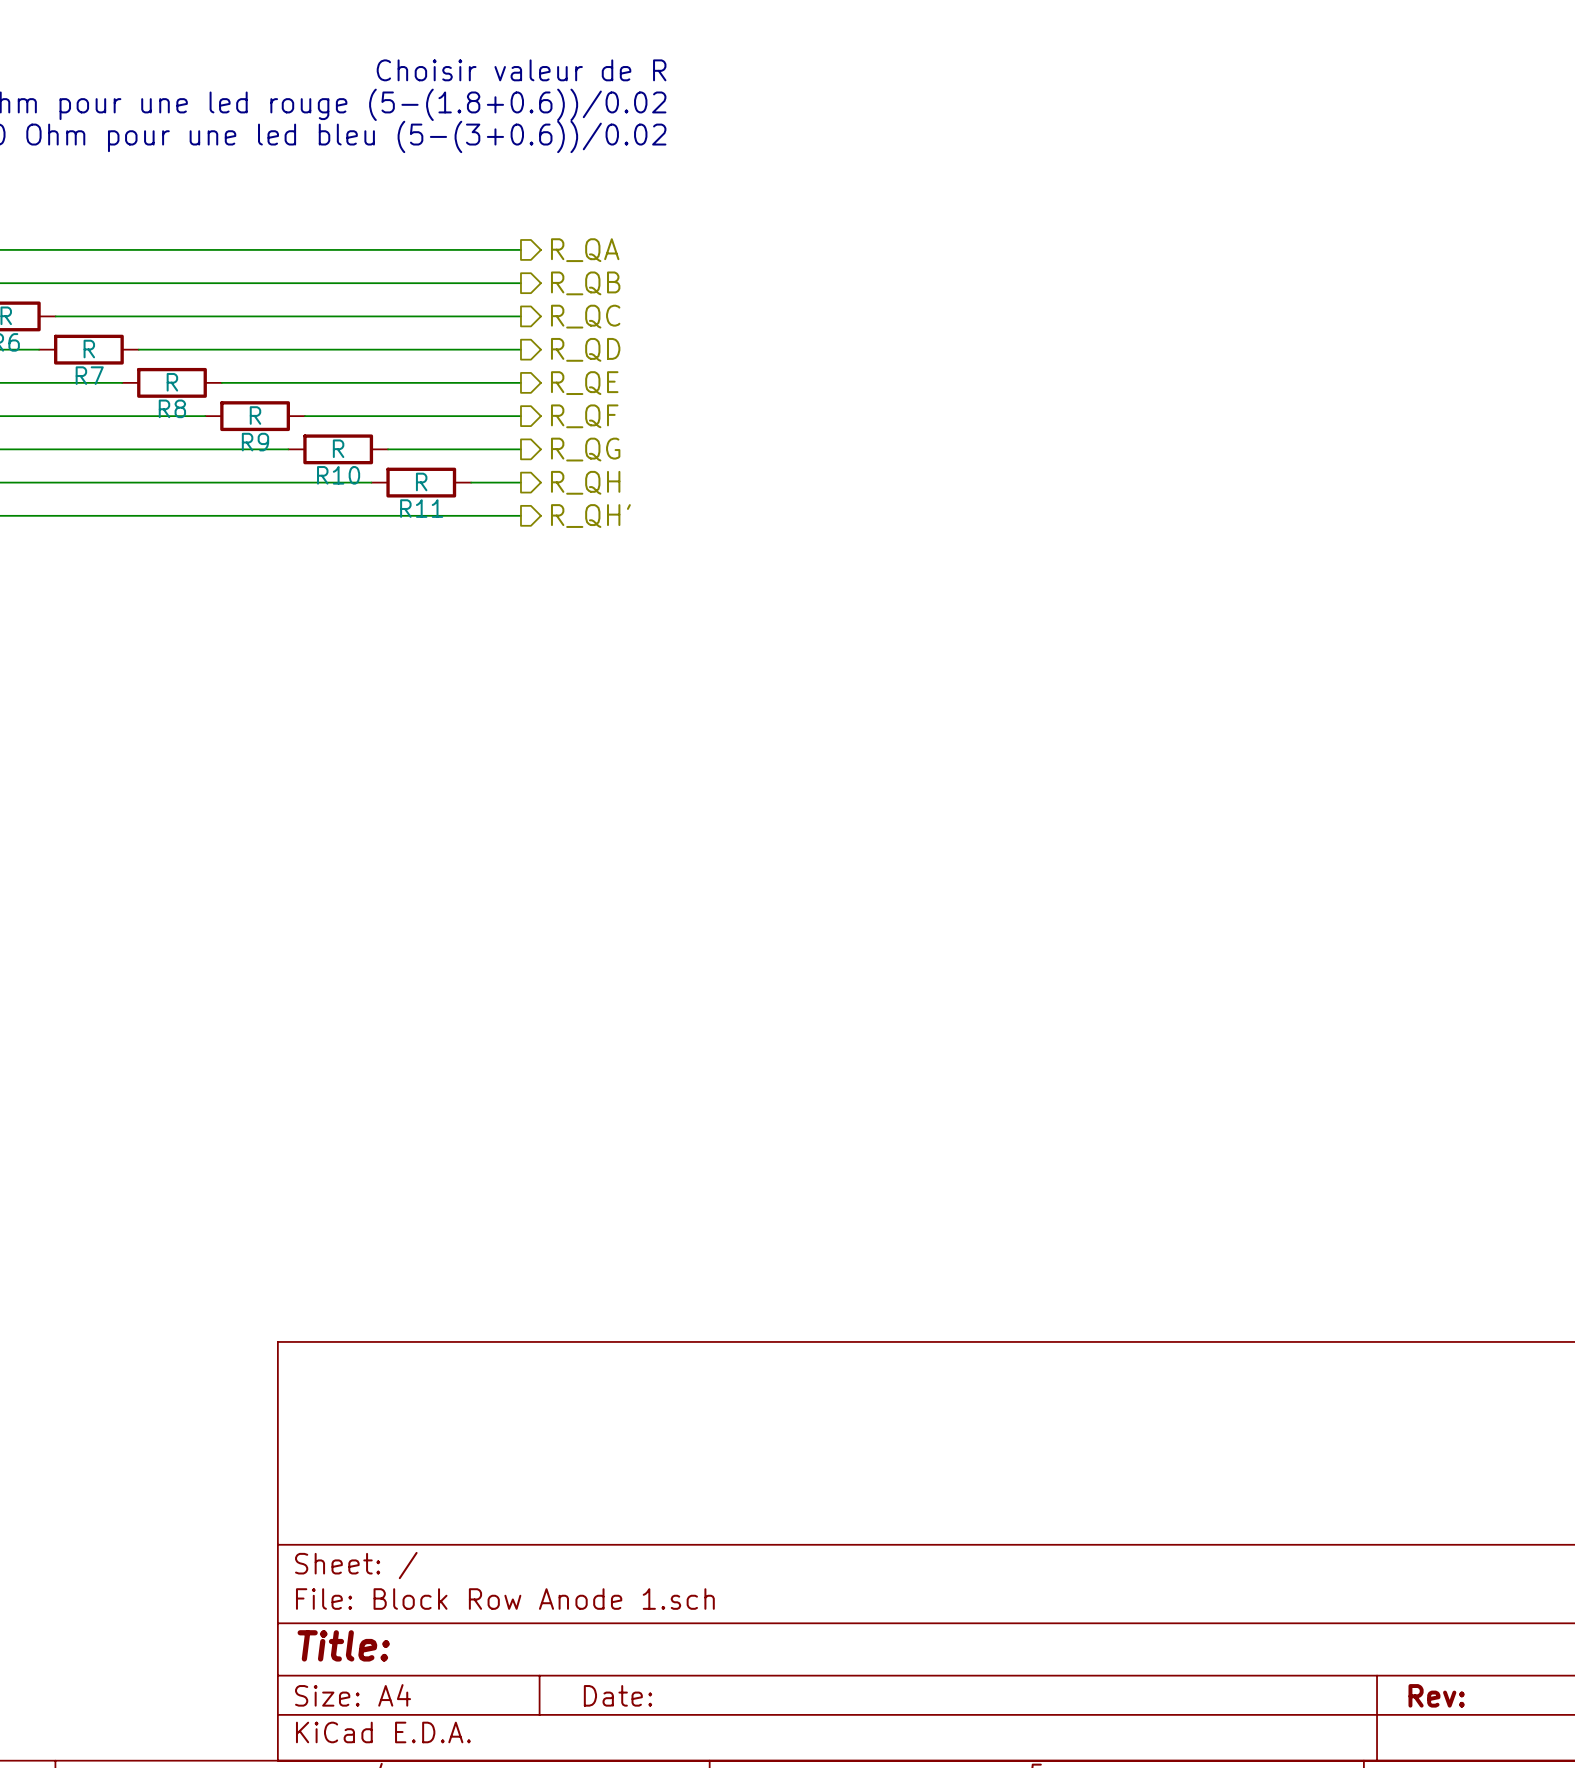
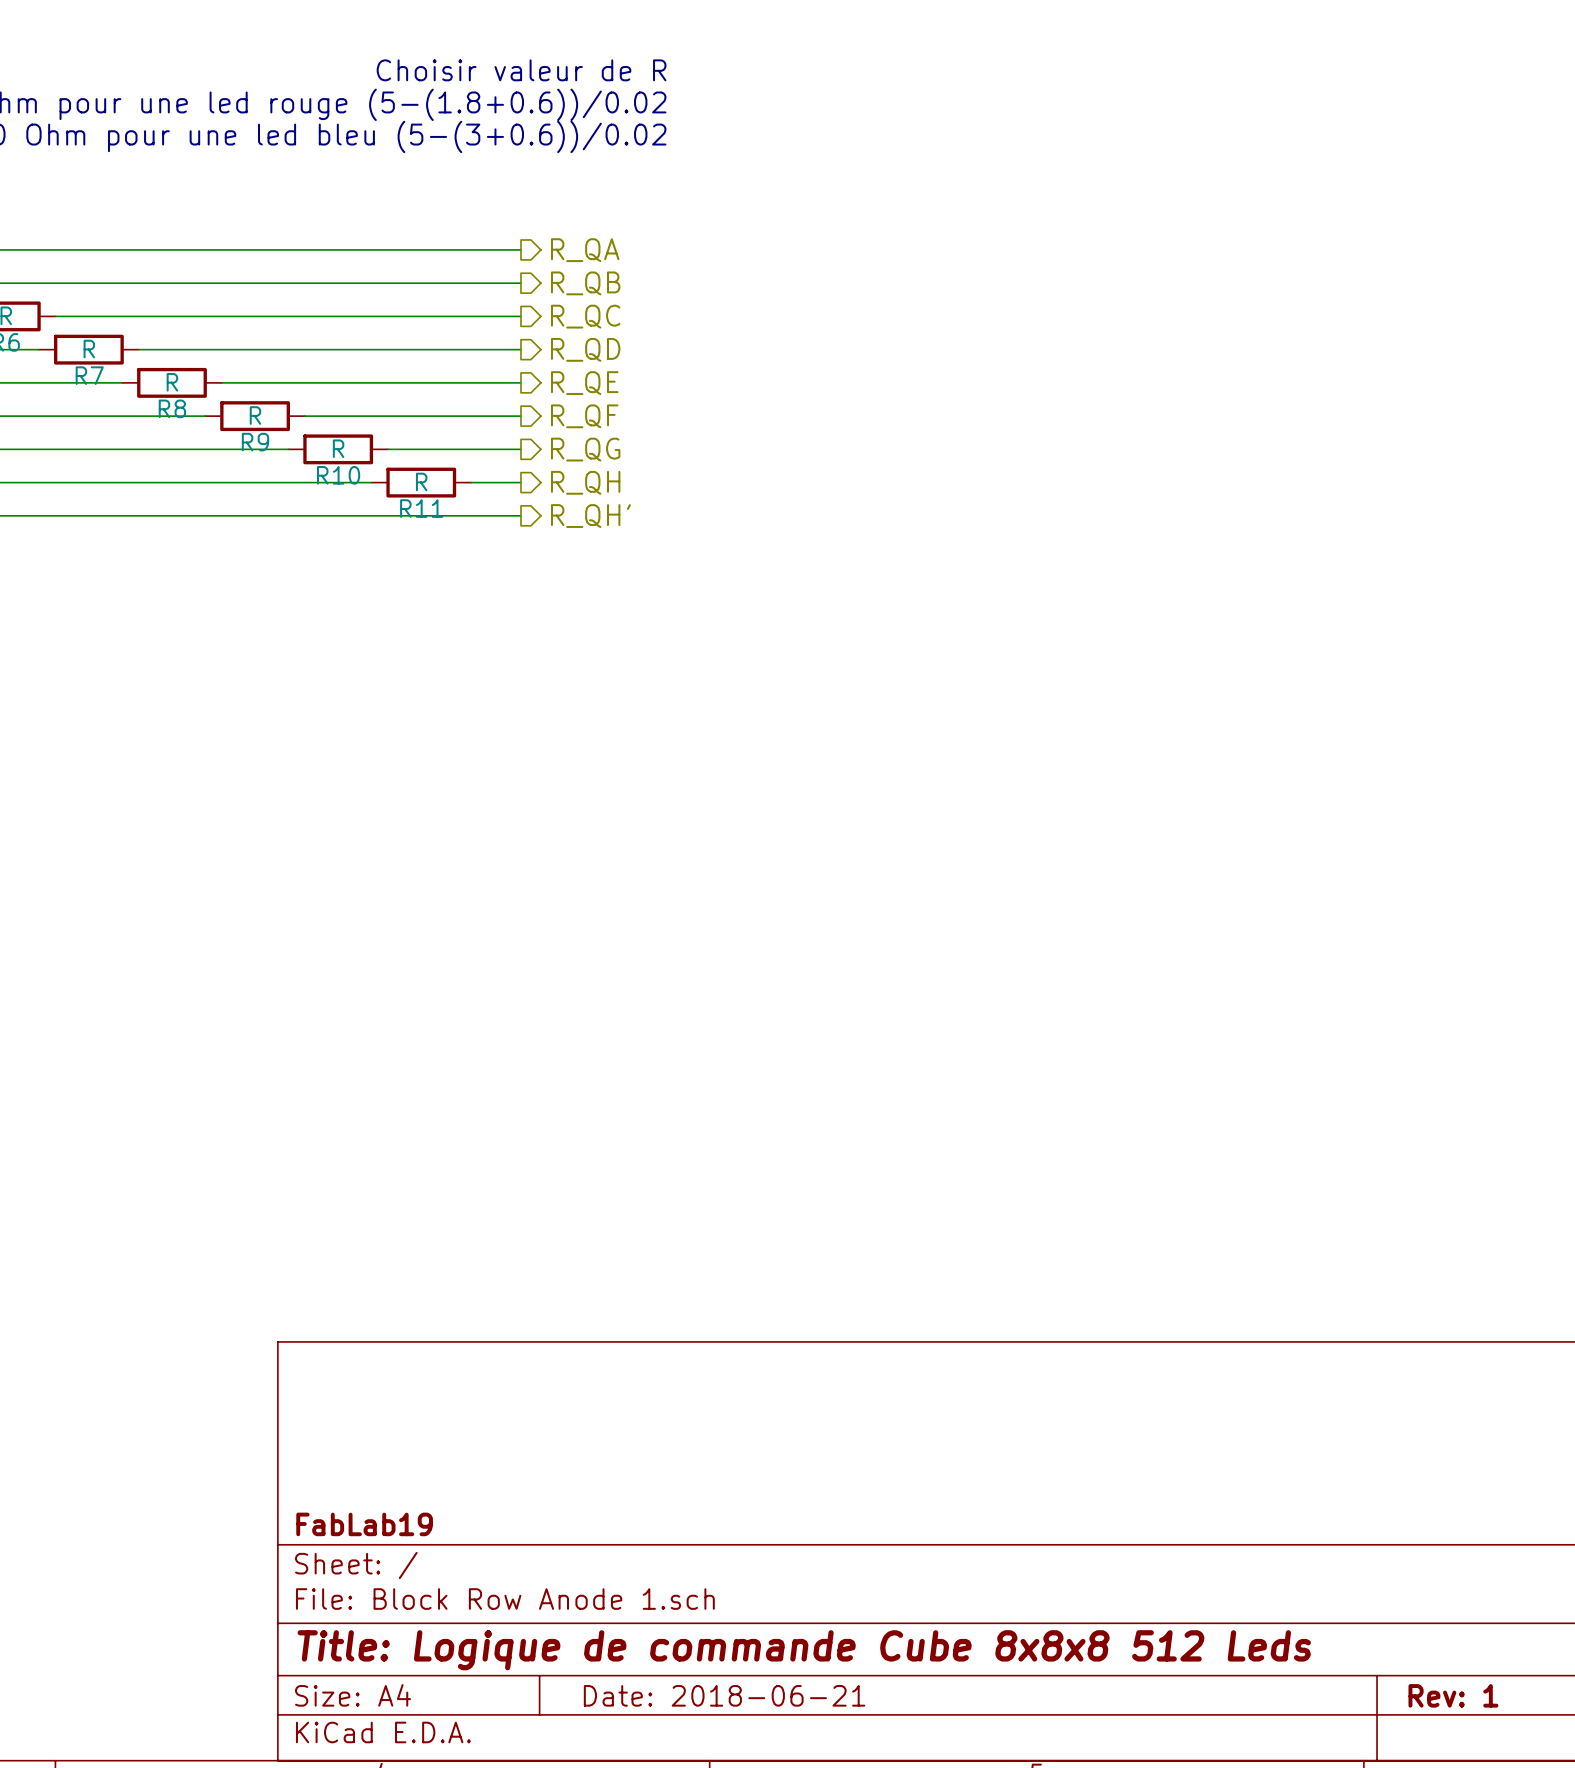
title block: none -> FabLab19 (364, 1524)
title block: Title: (343, 1645) -> Title: Logique de commande Cube 8x8x8 512 Leds (804, 1650)
title block: Date: (618, 1695) -> Date: 2018-06-21 (724, 1695)
title block: Rev: (1436, 1695) -> Rev: 1 (1453, 1695)

